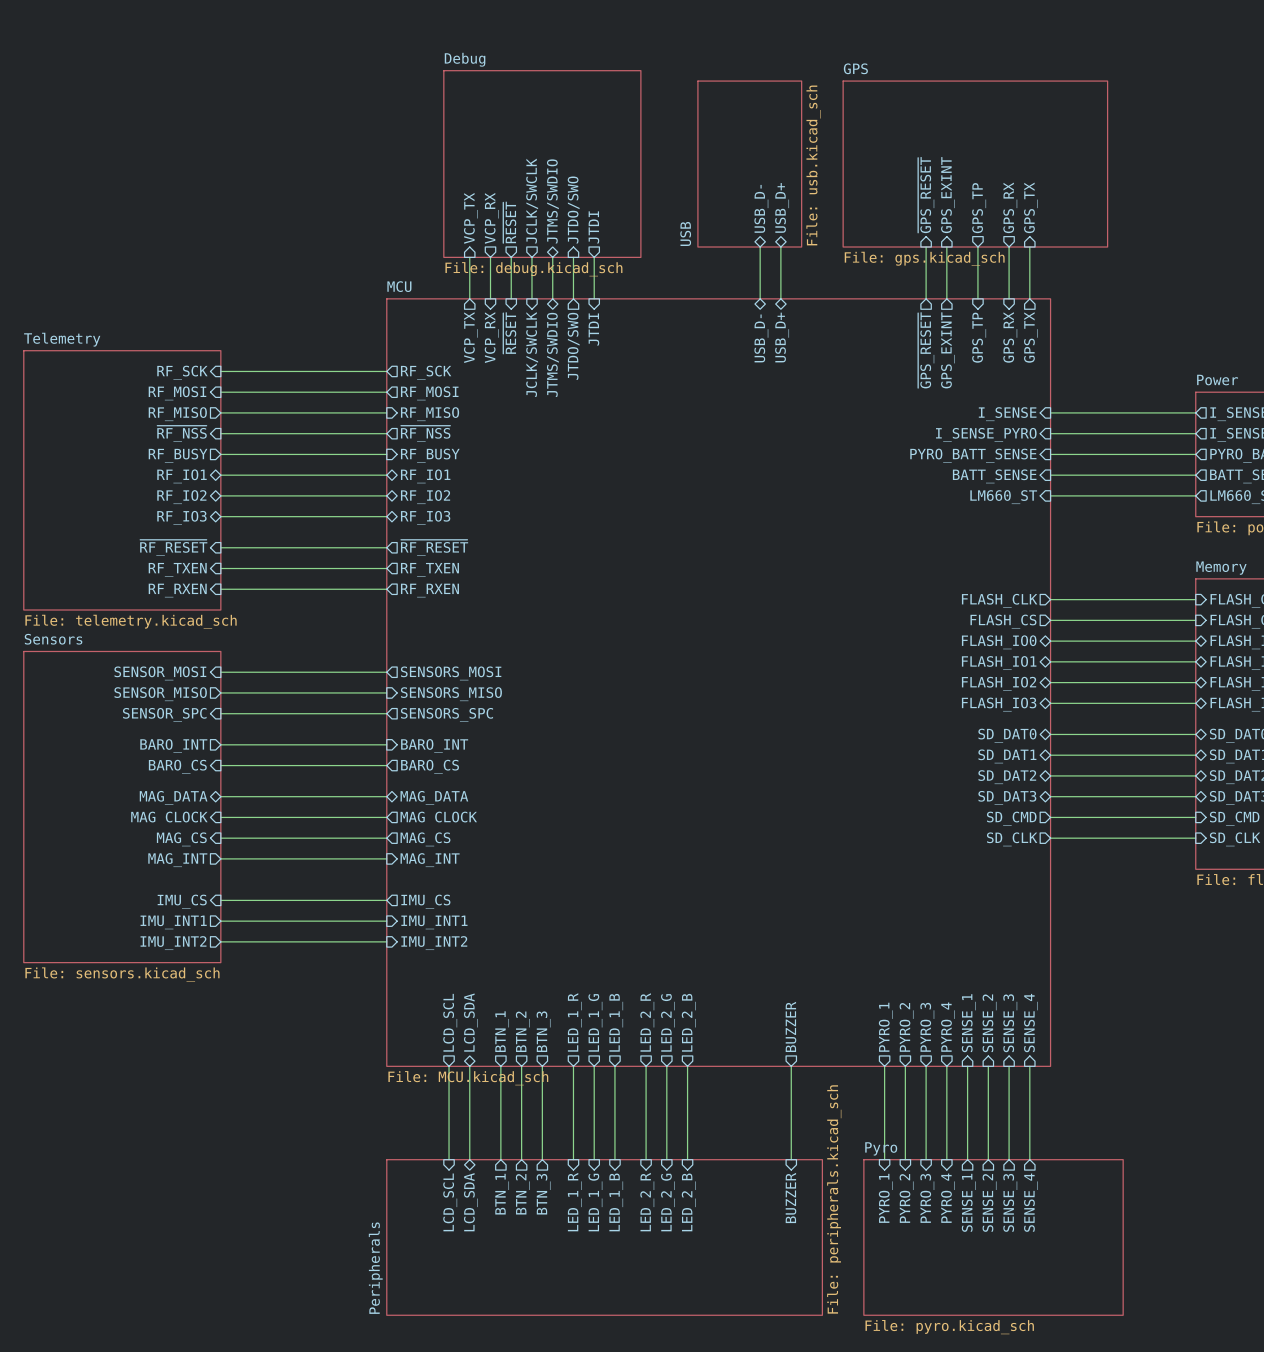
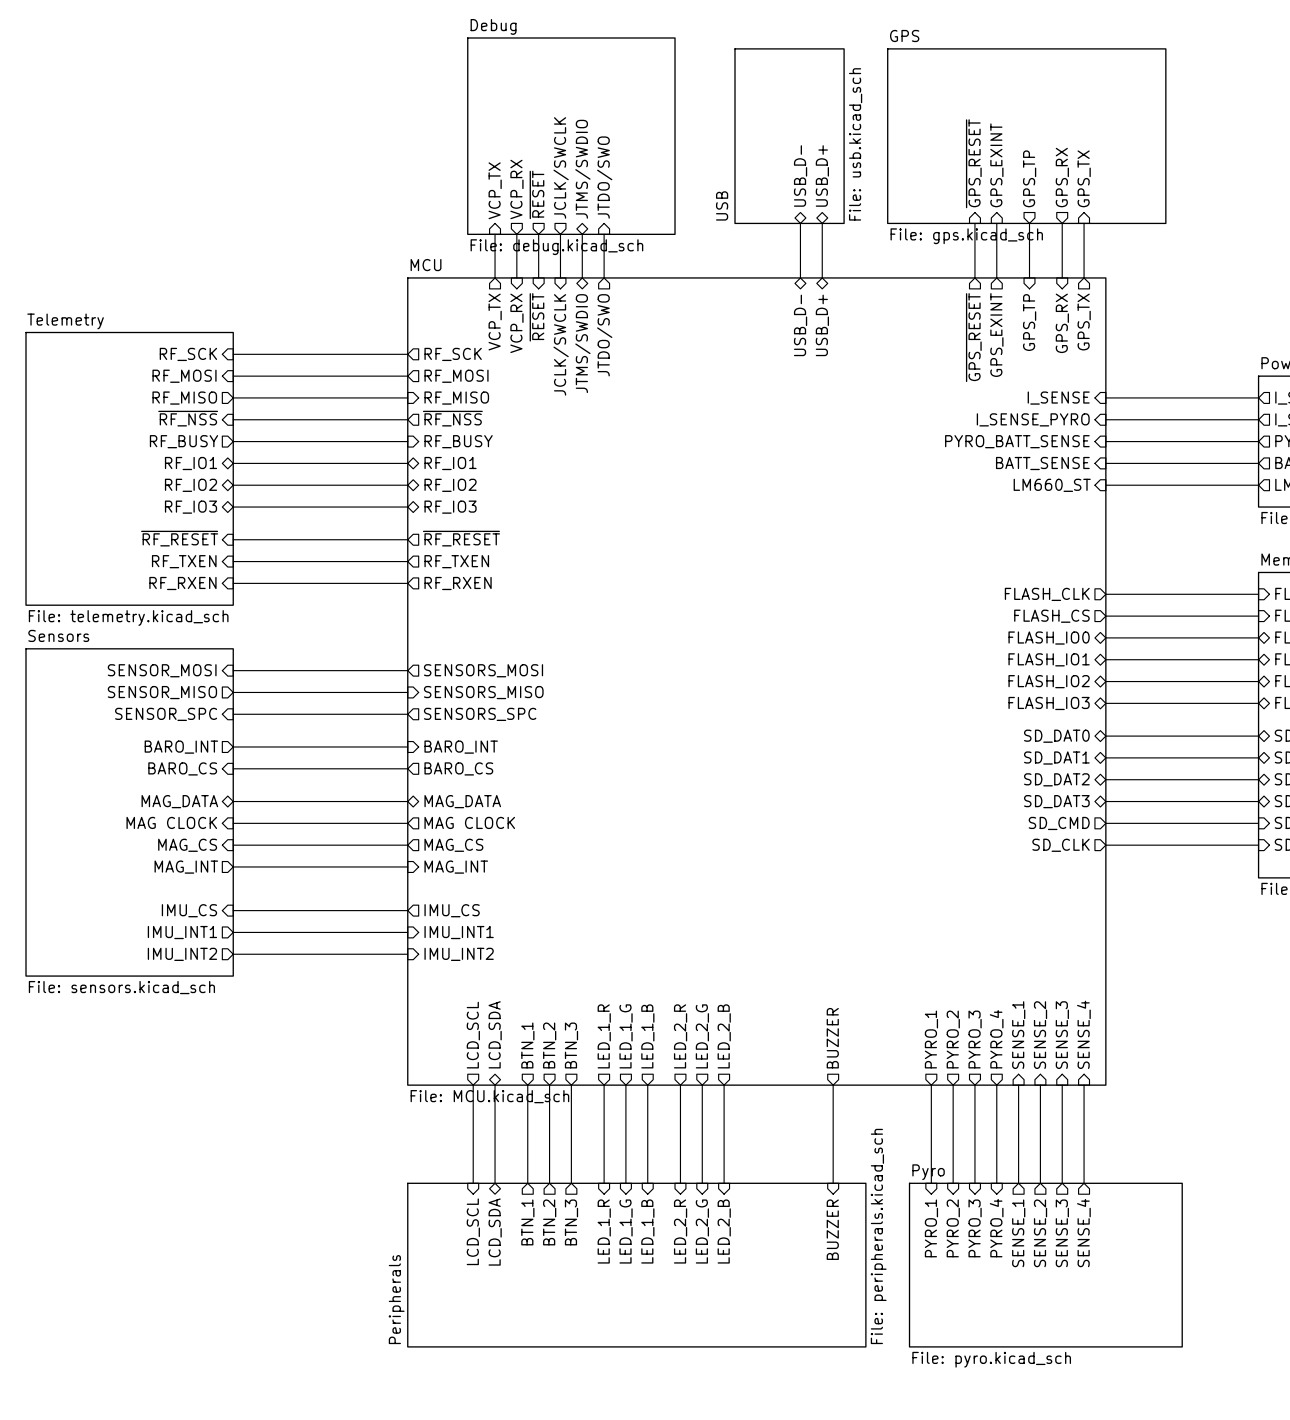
sheet pin: JTDI (593, 227) -> none
wire: (594, 257) (594, 298) -> none
sheet pin: JTDI (593, 329) -> none

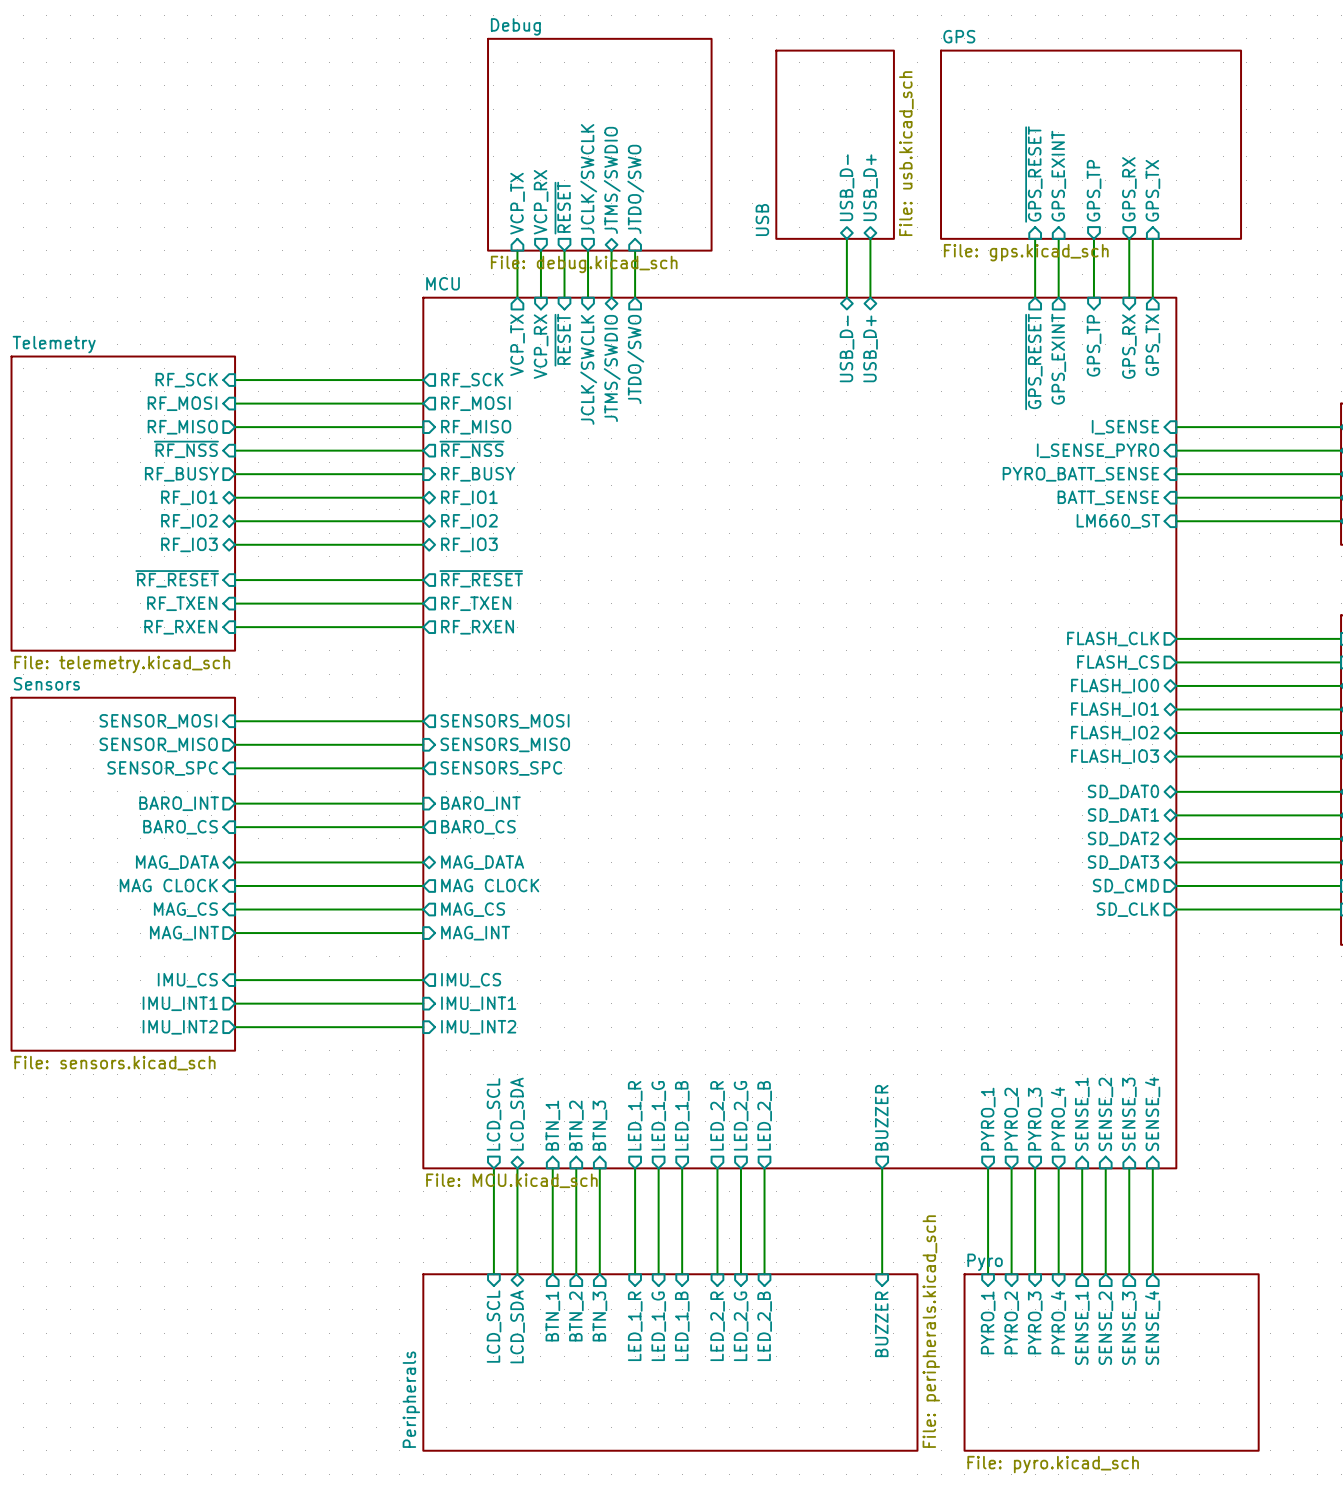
sheet pin shape: output (527, 1045) -> input (552, 1125)
sheet pin shape: output (549, 1045) -> input (576, 1125)
sheet pin shape: output (571, 1045) -> input (599, 1125)

